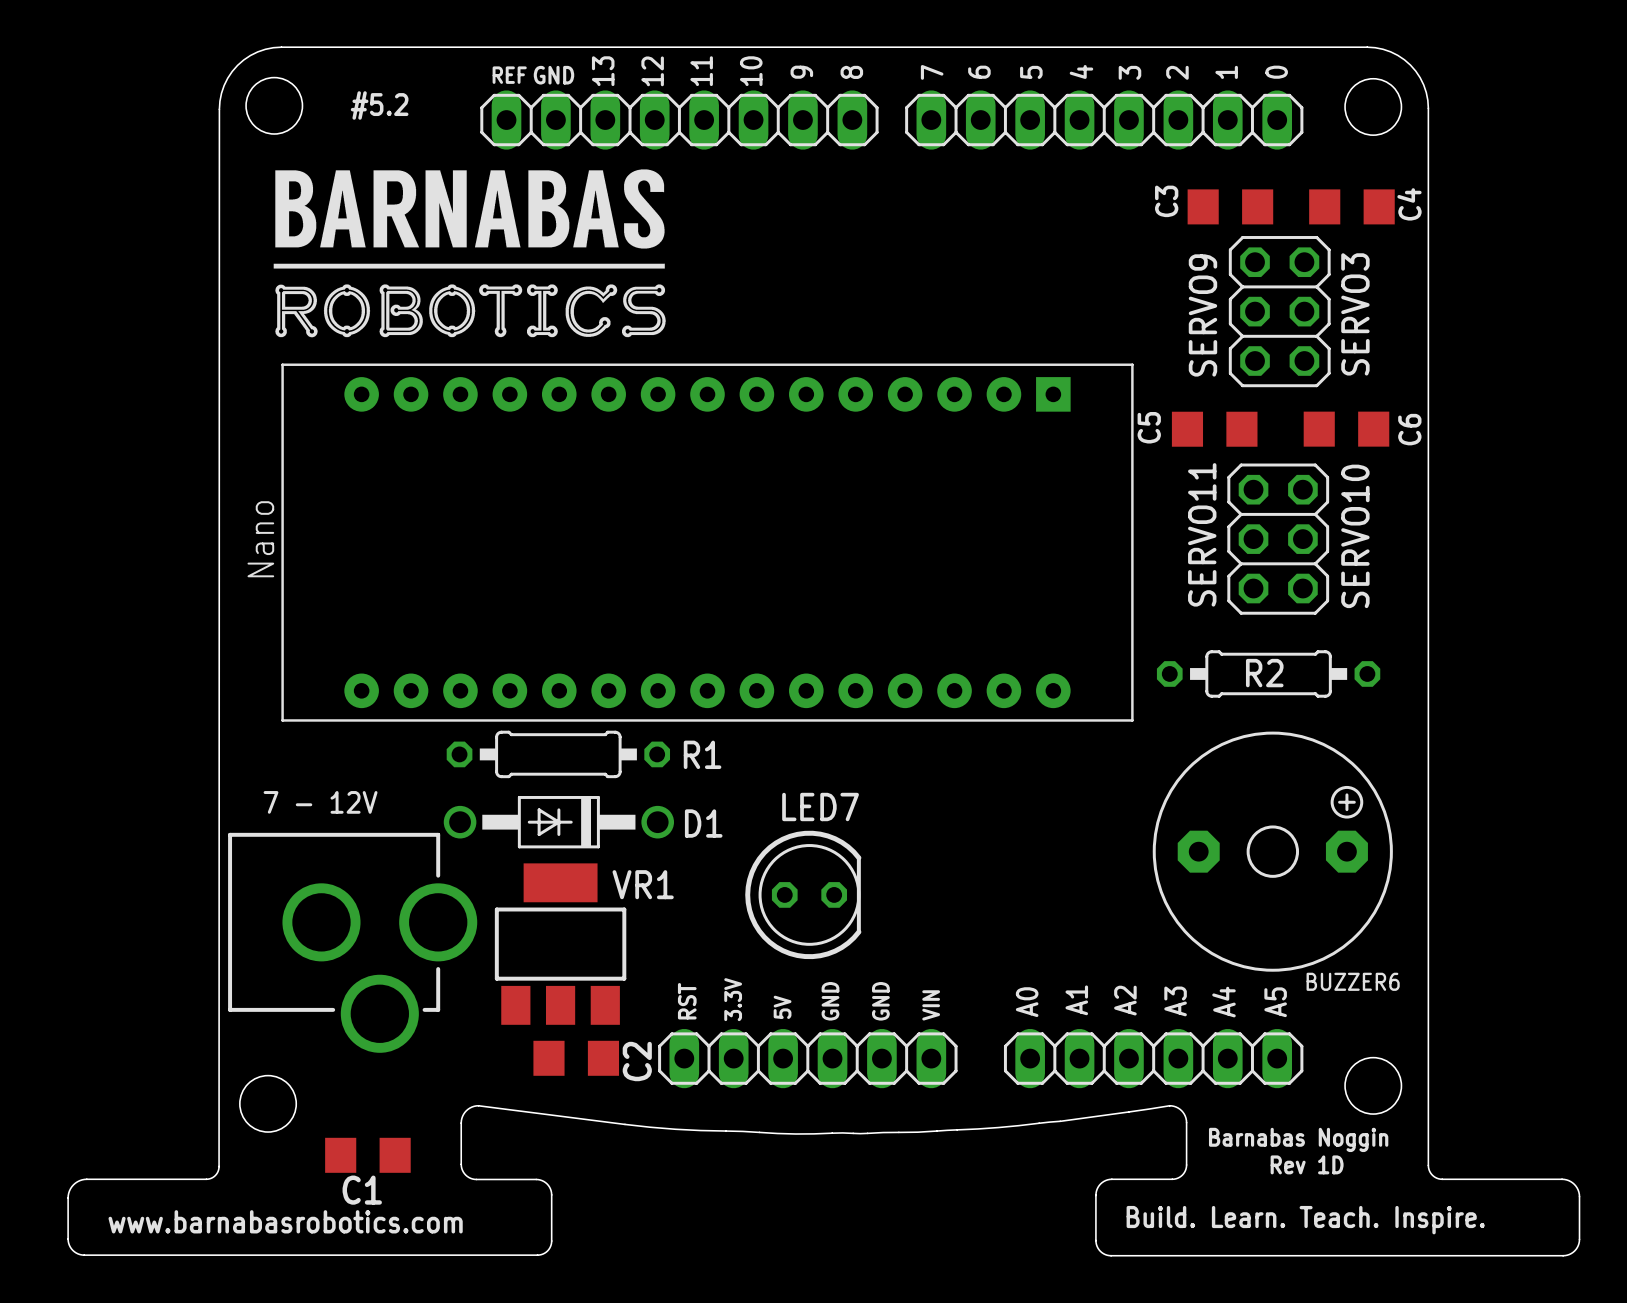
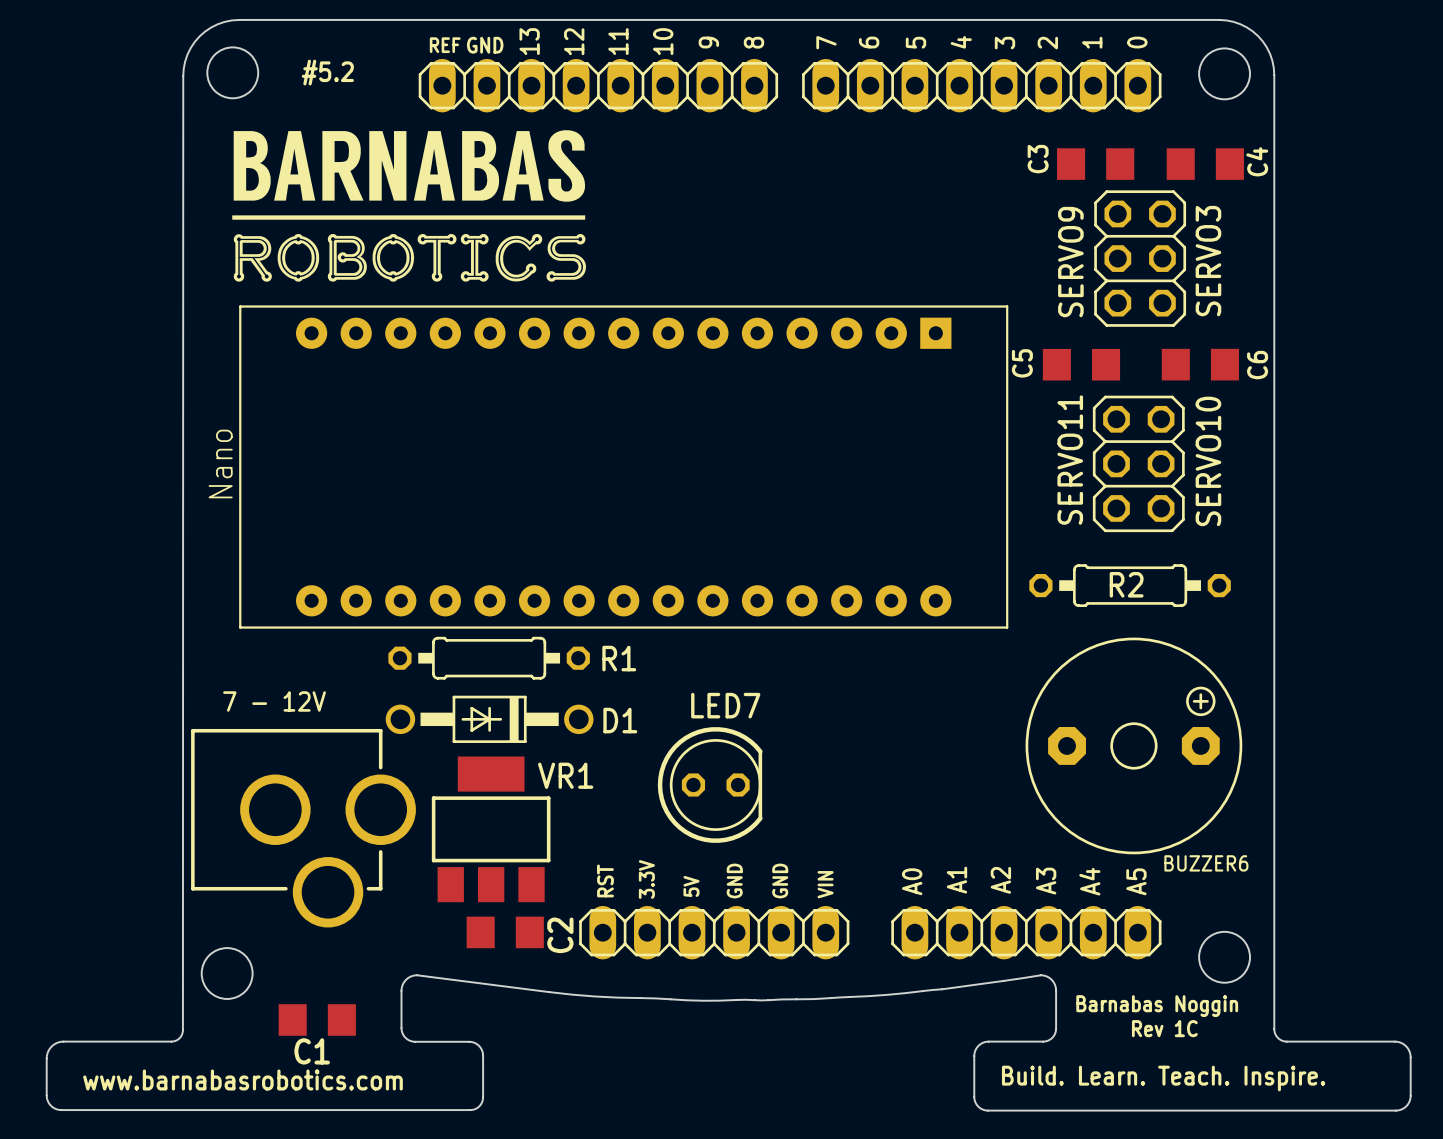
text: Rev 1D (1307, 1164) -> Rev 1C (1164, 1028)

